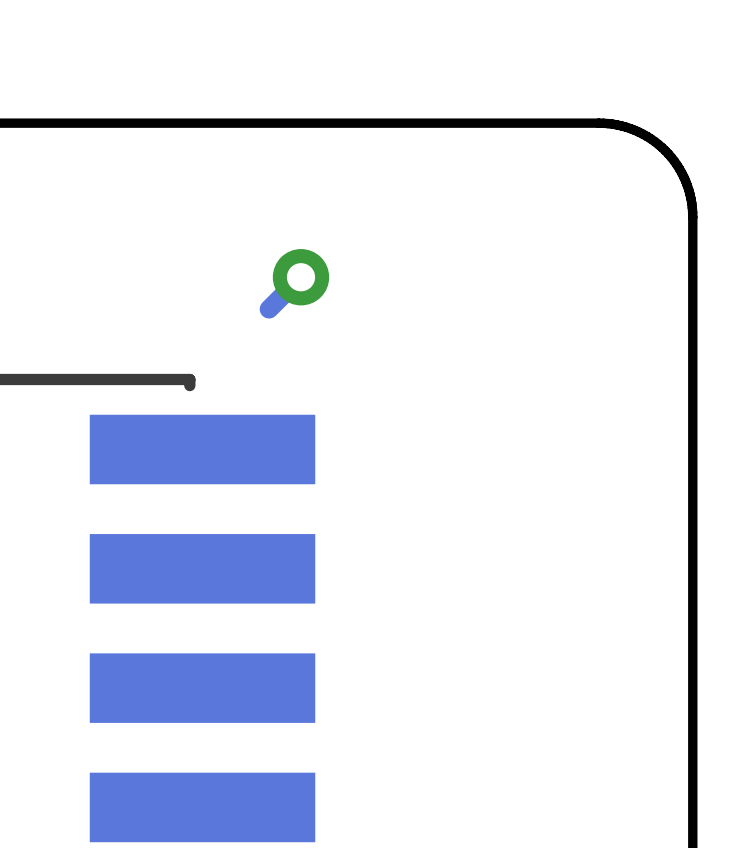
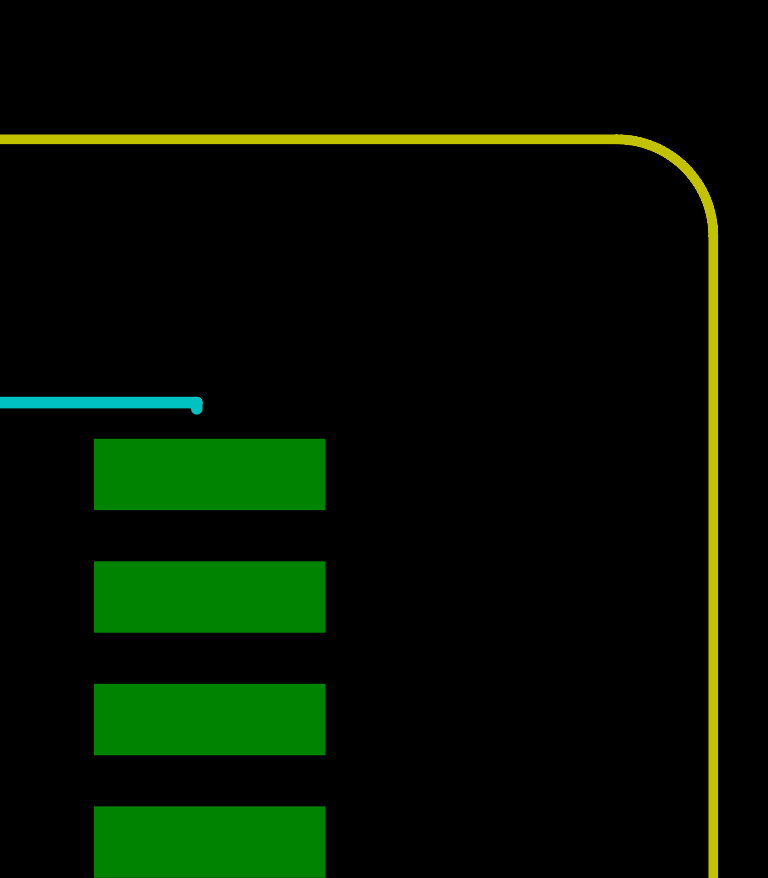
track: (301, 277) (269, 309) -> none
via: (301, 277) -> none

